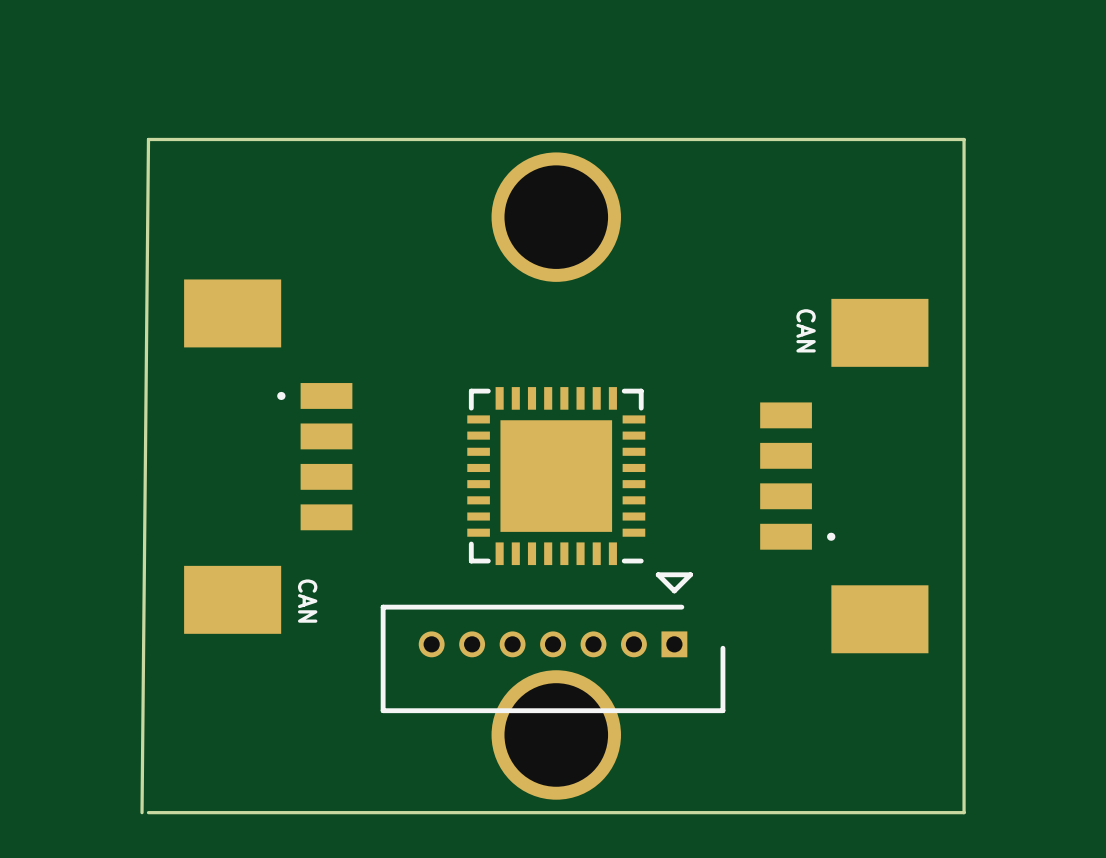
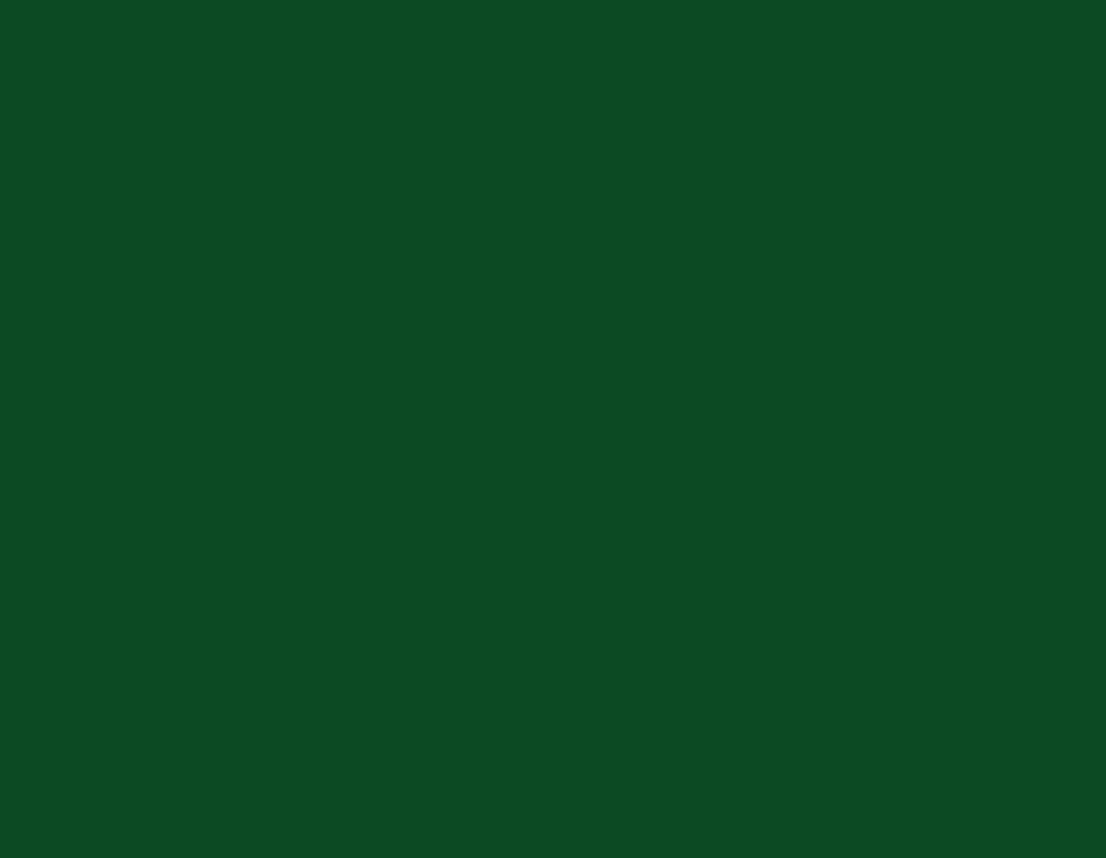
part: (556, 217) -> none
part: CAN (268, 456) -> none
part: (556, 476) -> none
part: CAN (844, 476) -> none
part: (553, 642) -> none
part: (556, 734) -> none
board edge: (148, 812) (964, 812) (964, 139) (148, 139) (142, 812) -> none

